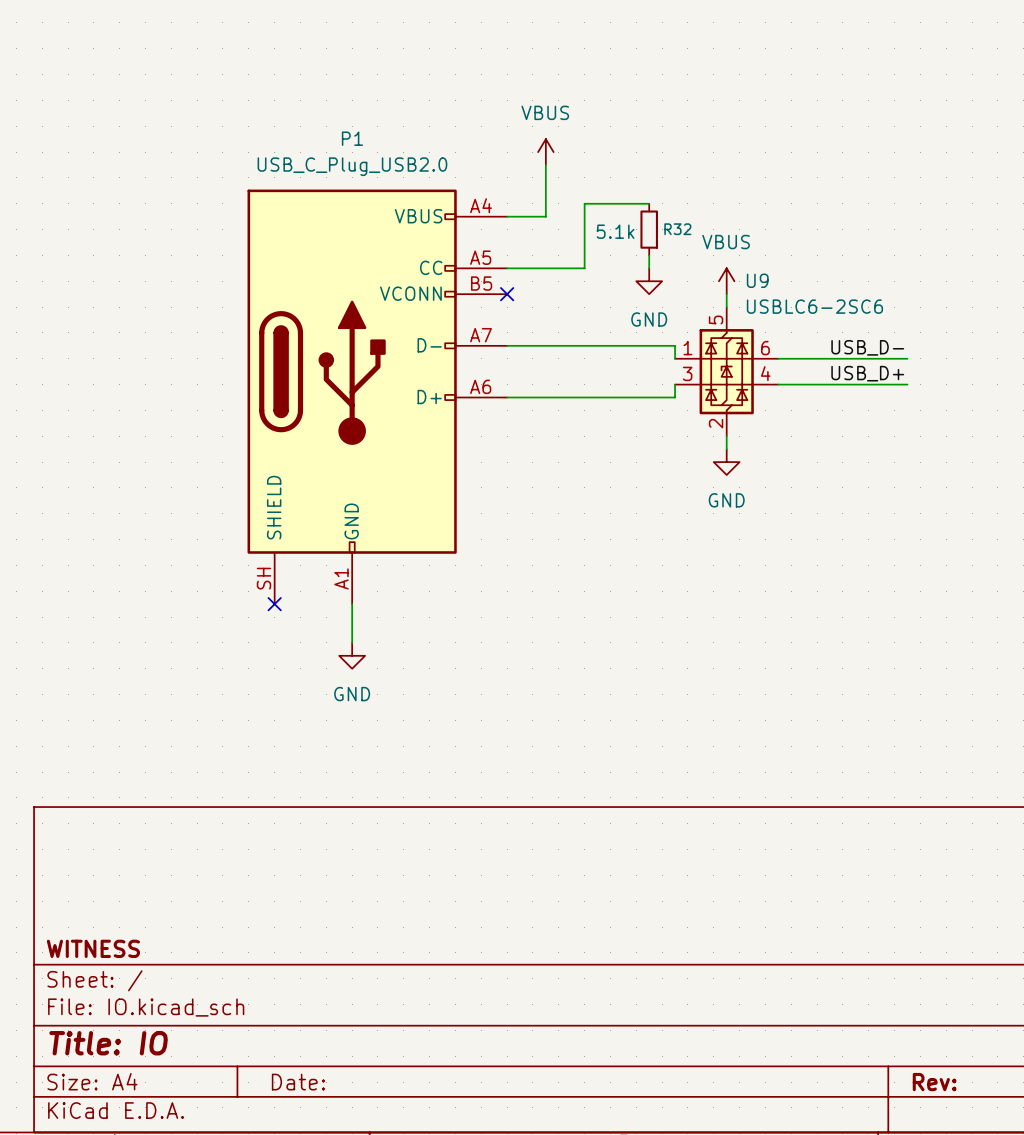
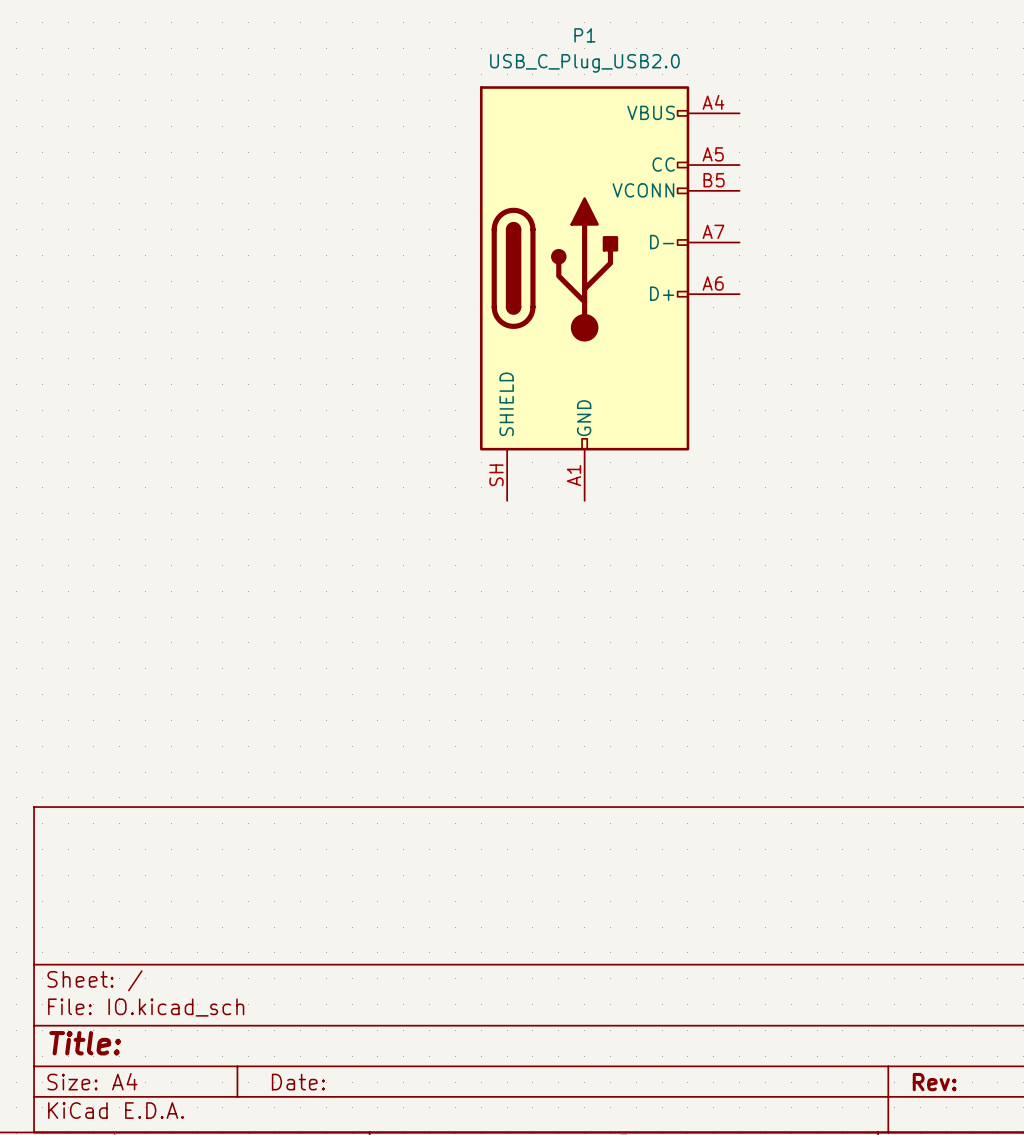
power symbol: VBUS (545, 152) -> none
R32: 5.1k (649, 229) -> none
power symbol: GND (649, 281) -> none
power symbol: VBUS (726, 281) -> none
no-connect mark: (507, 294) -> none
wire: (726, 294) (726, 307) -> none
label: USB_D- (867, 347) -> none
wire: (778, 358) (907, 358) -> none
U9: USBLC6-2SC6 (726, 371) -> none
label: USB_D+ (867, 373) -> none
wire: (778, 384) (907, 384) -> none
P1 position: (377, 396) -> (609, 293)
wire: (726, 436) (726, 449) -> none
power symbol: GND (726, 462) -> none
no-connect mark: (274, 604) -> none
wire: (352, 604) (352, 642) -> none
power symbol: GND (352, 655) -> none
title block: WITNESS (93, 948) -> none
title block: Title: IO (108, 1043) -> Title: (85, 1043)

